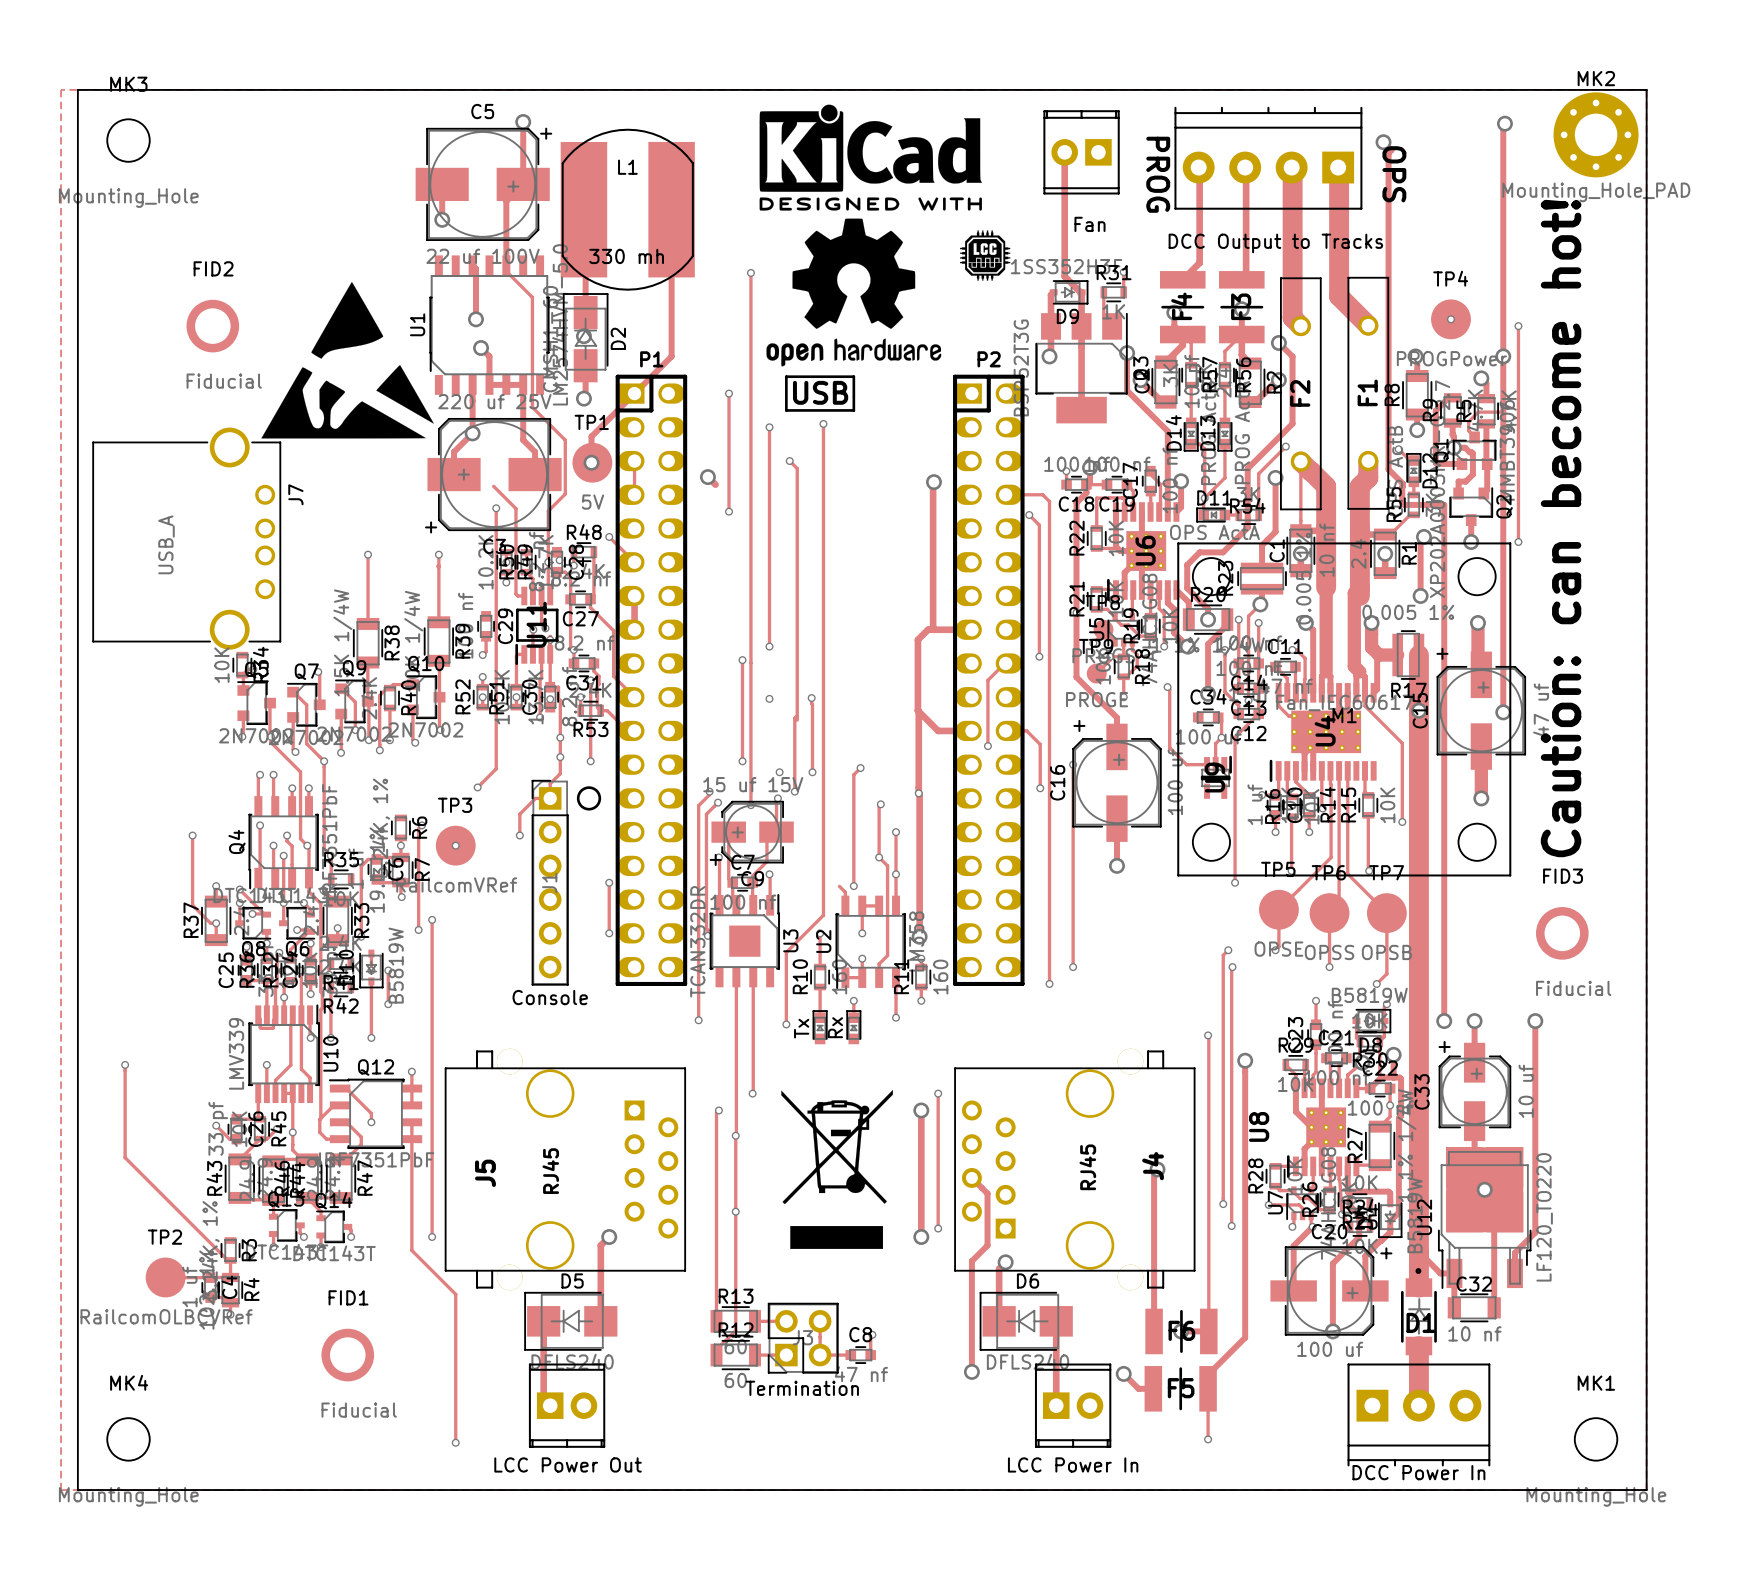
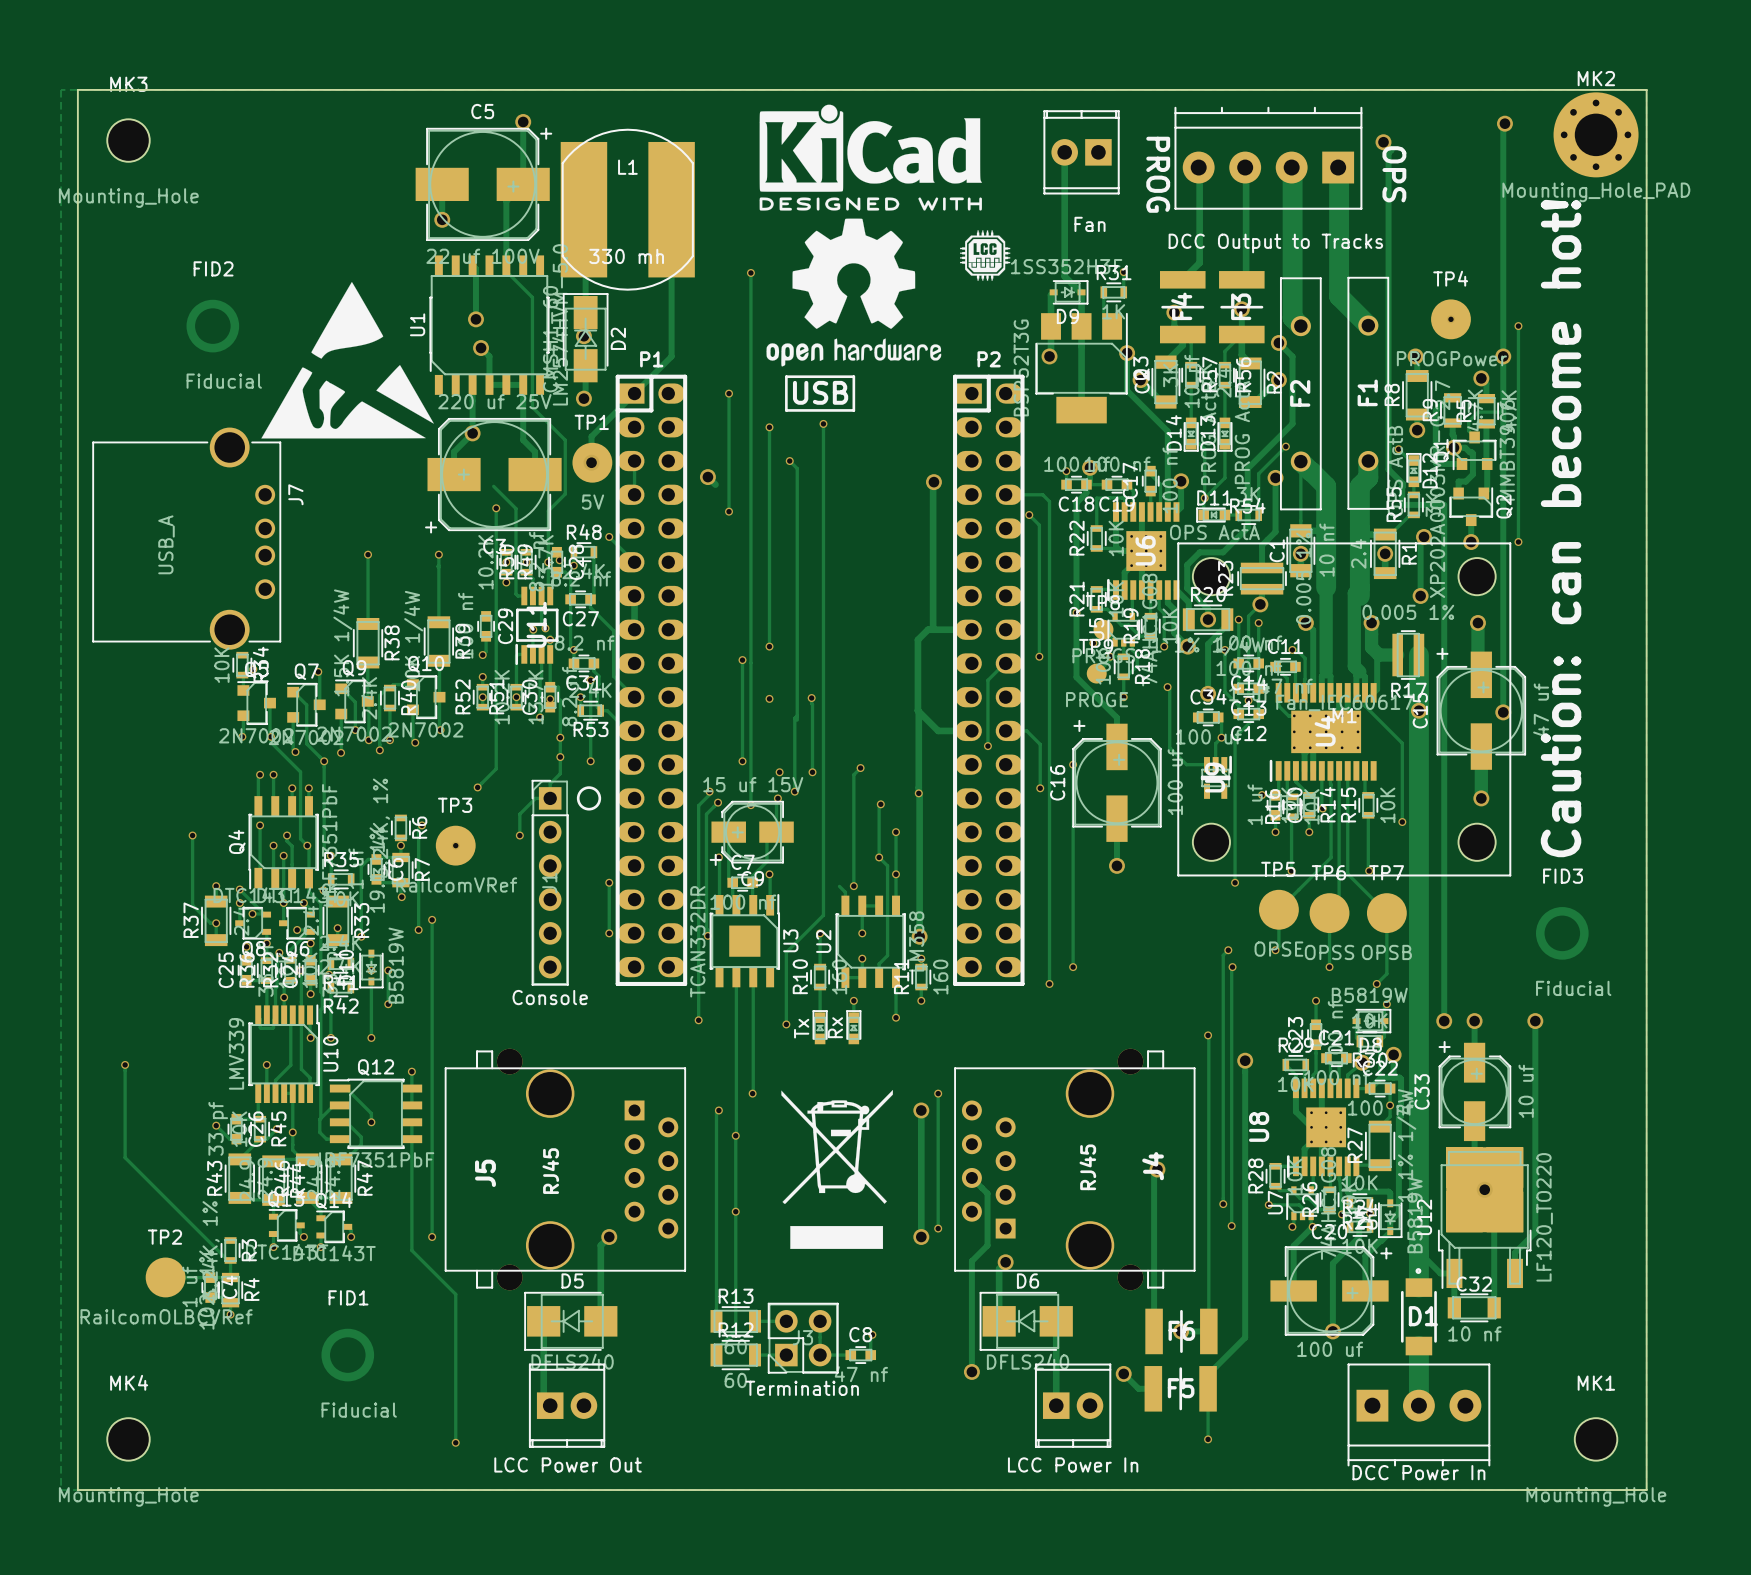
D1 footprint: [1401, 1268, 1437, 1356] -> [1401, 1268, 1437, 1356]

